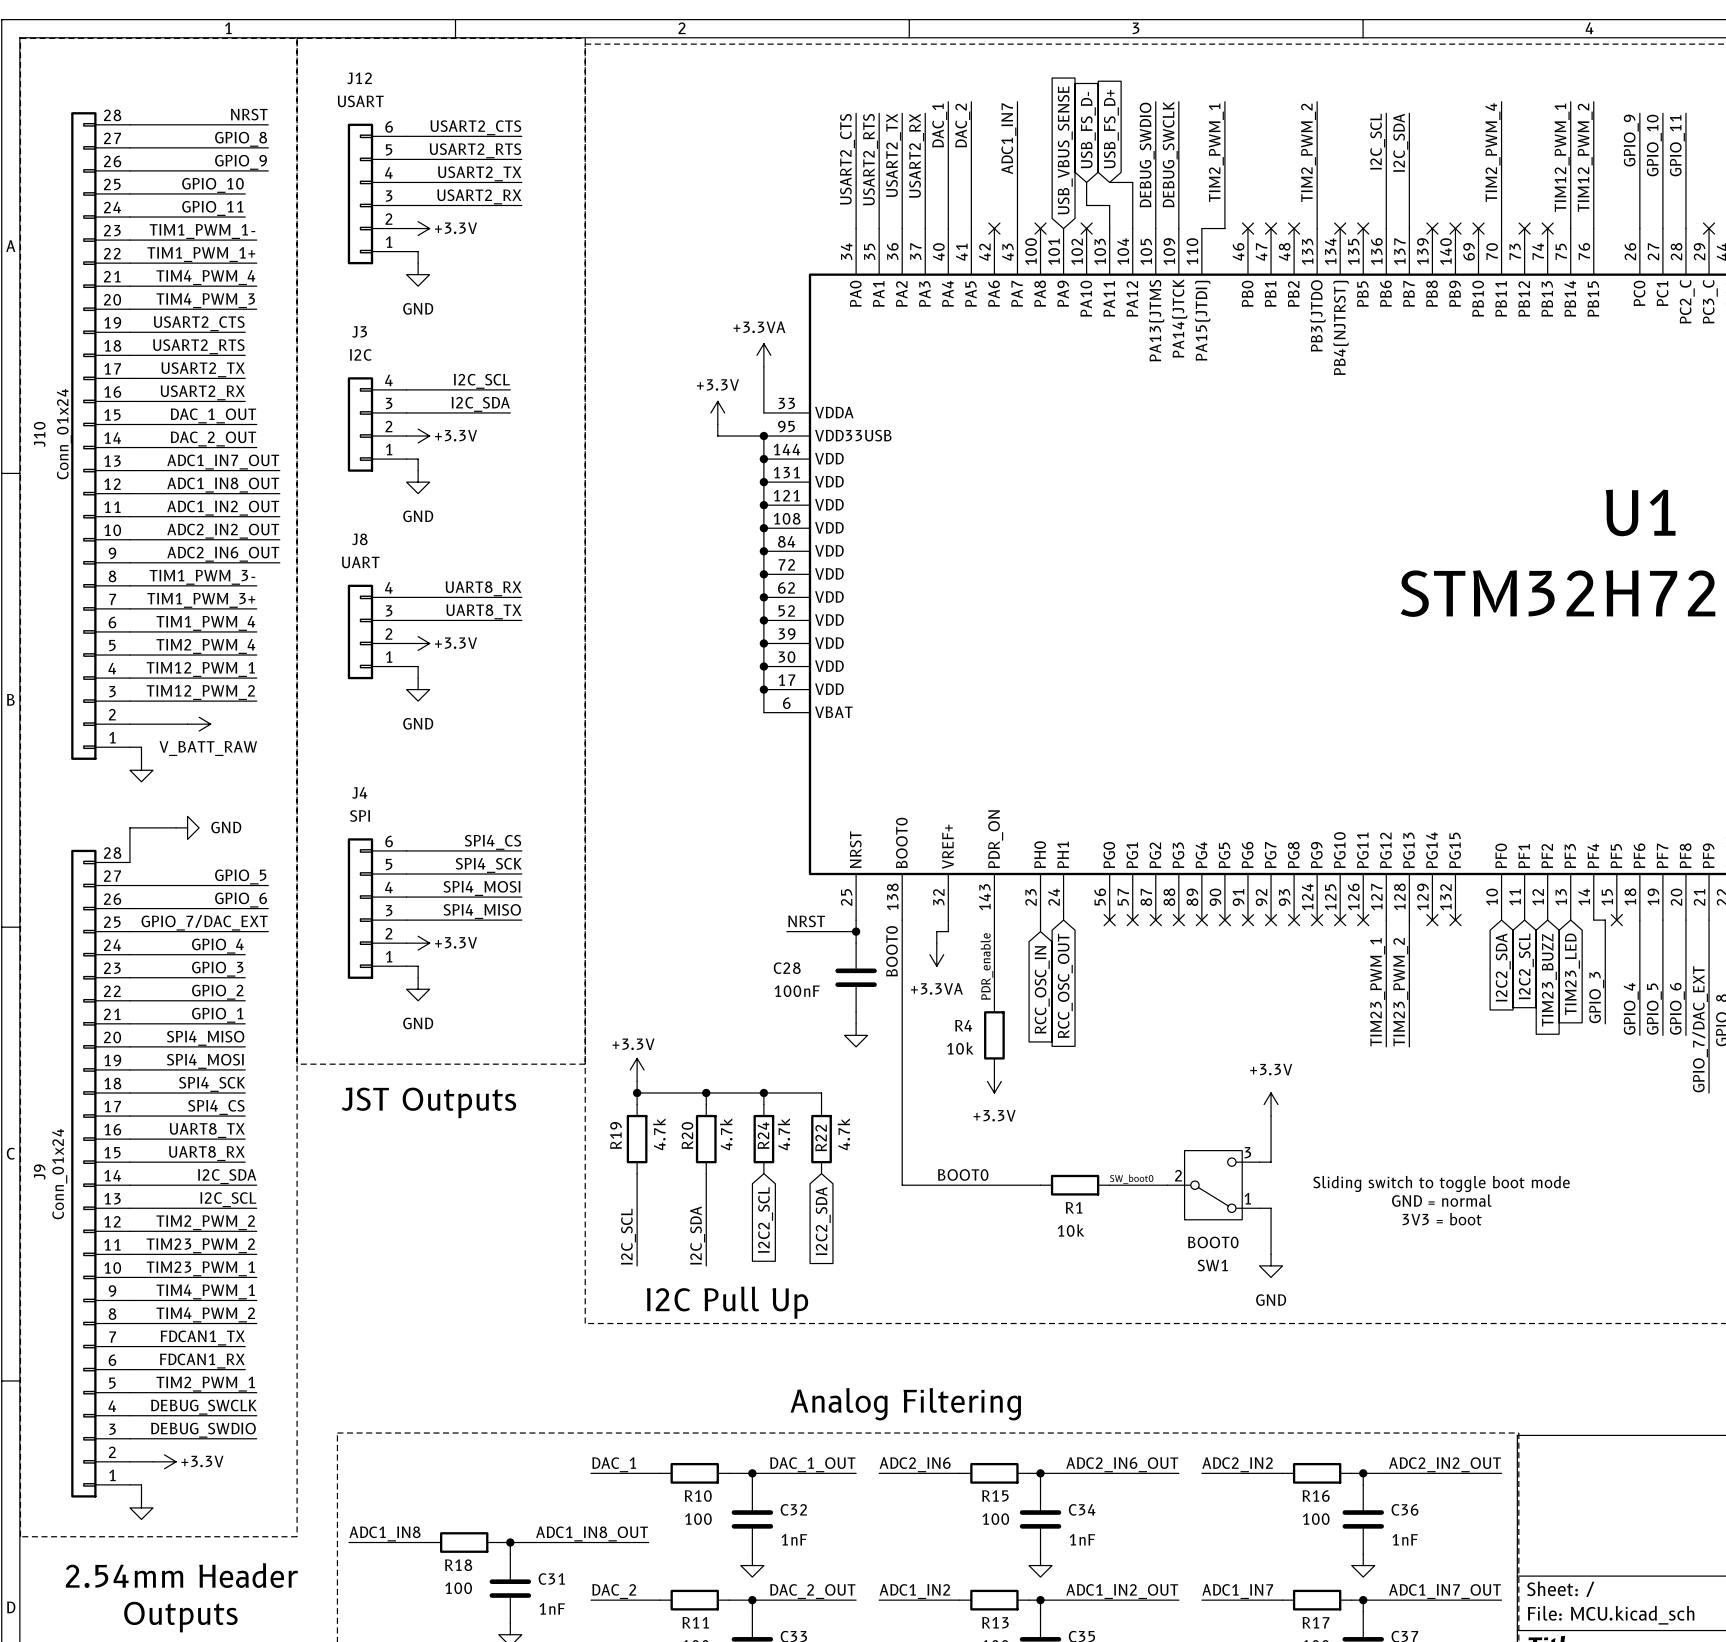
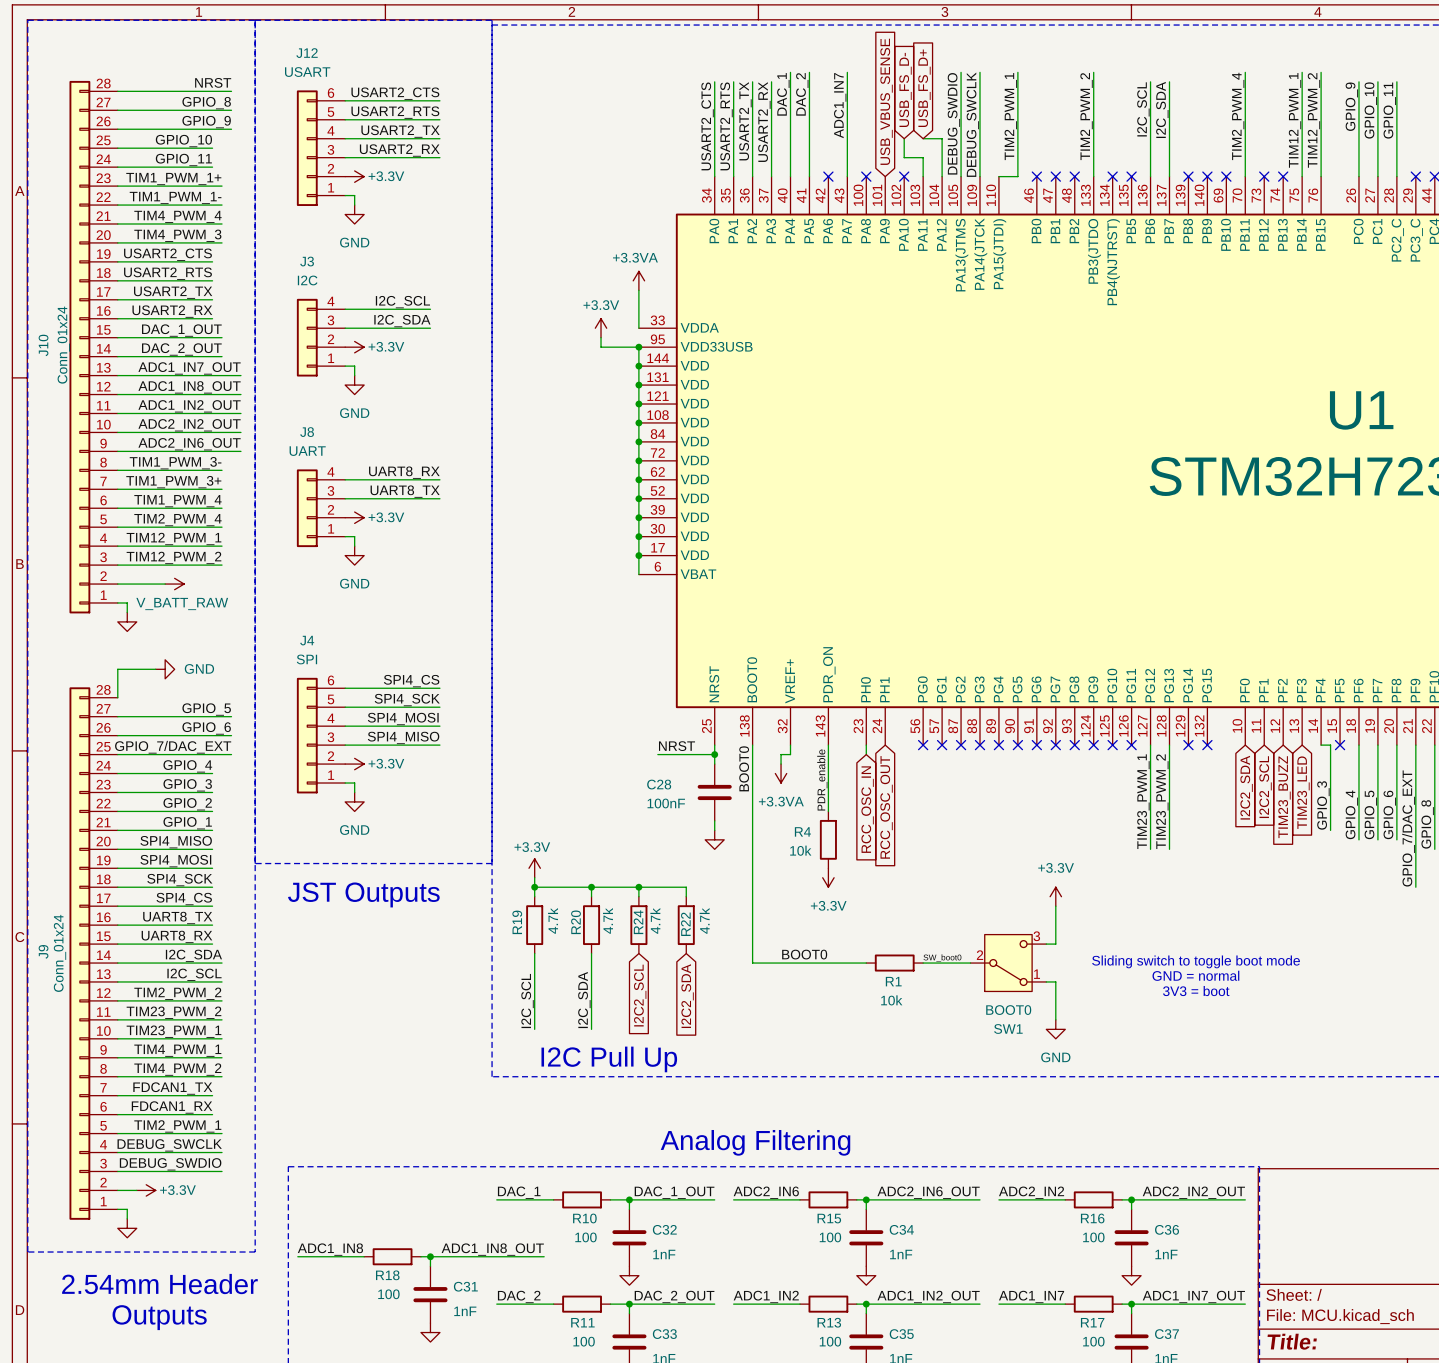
label: TIM1_PWM_1- (202, 231) -> TIM1_PWM_1+ (173, 179)
label: TIM1_PWM_1+ (201, 254) -> TIM1_PWM_1- (175, 197)

